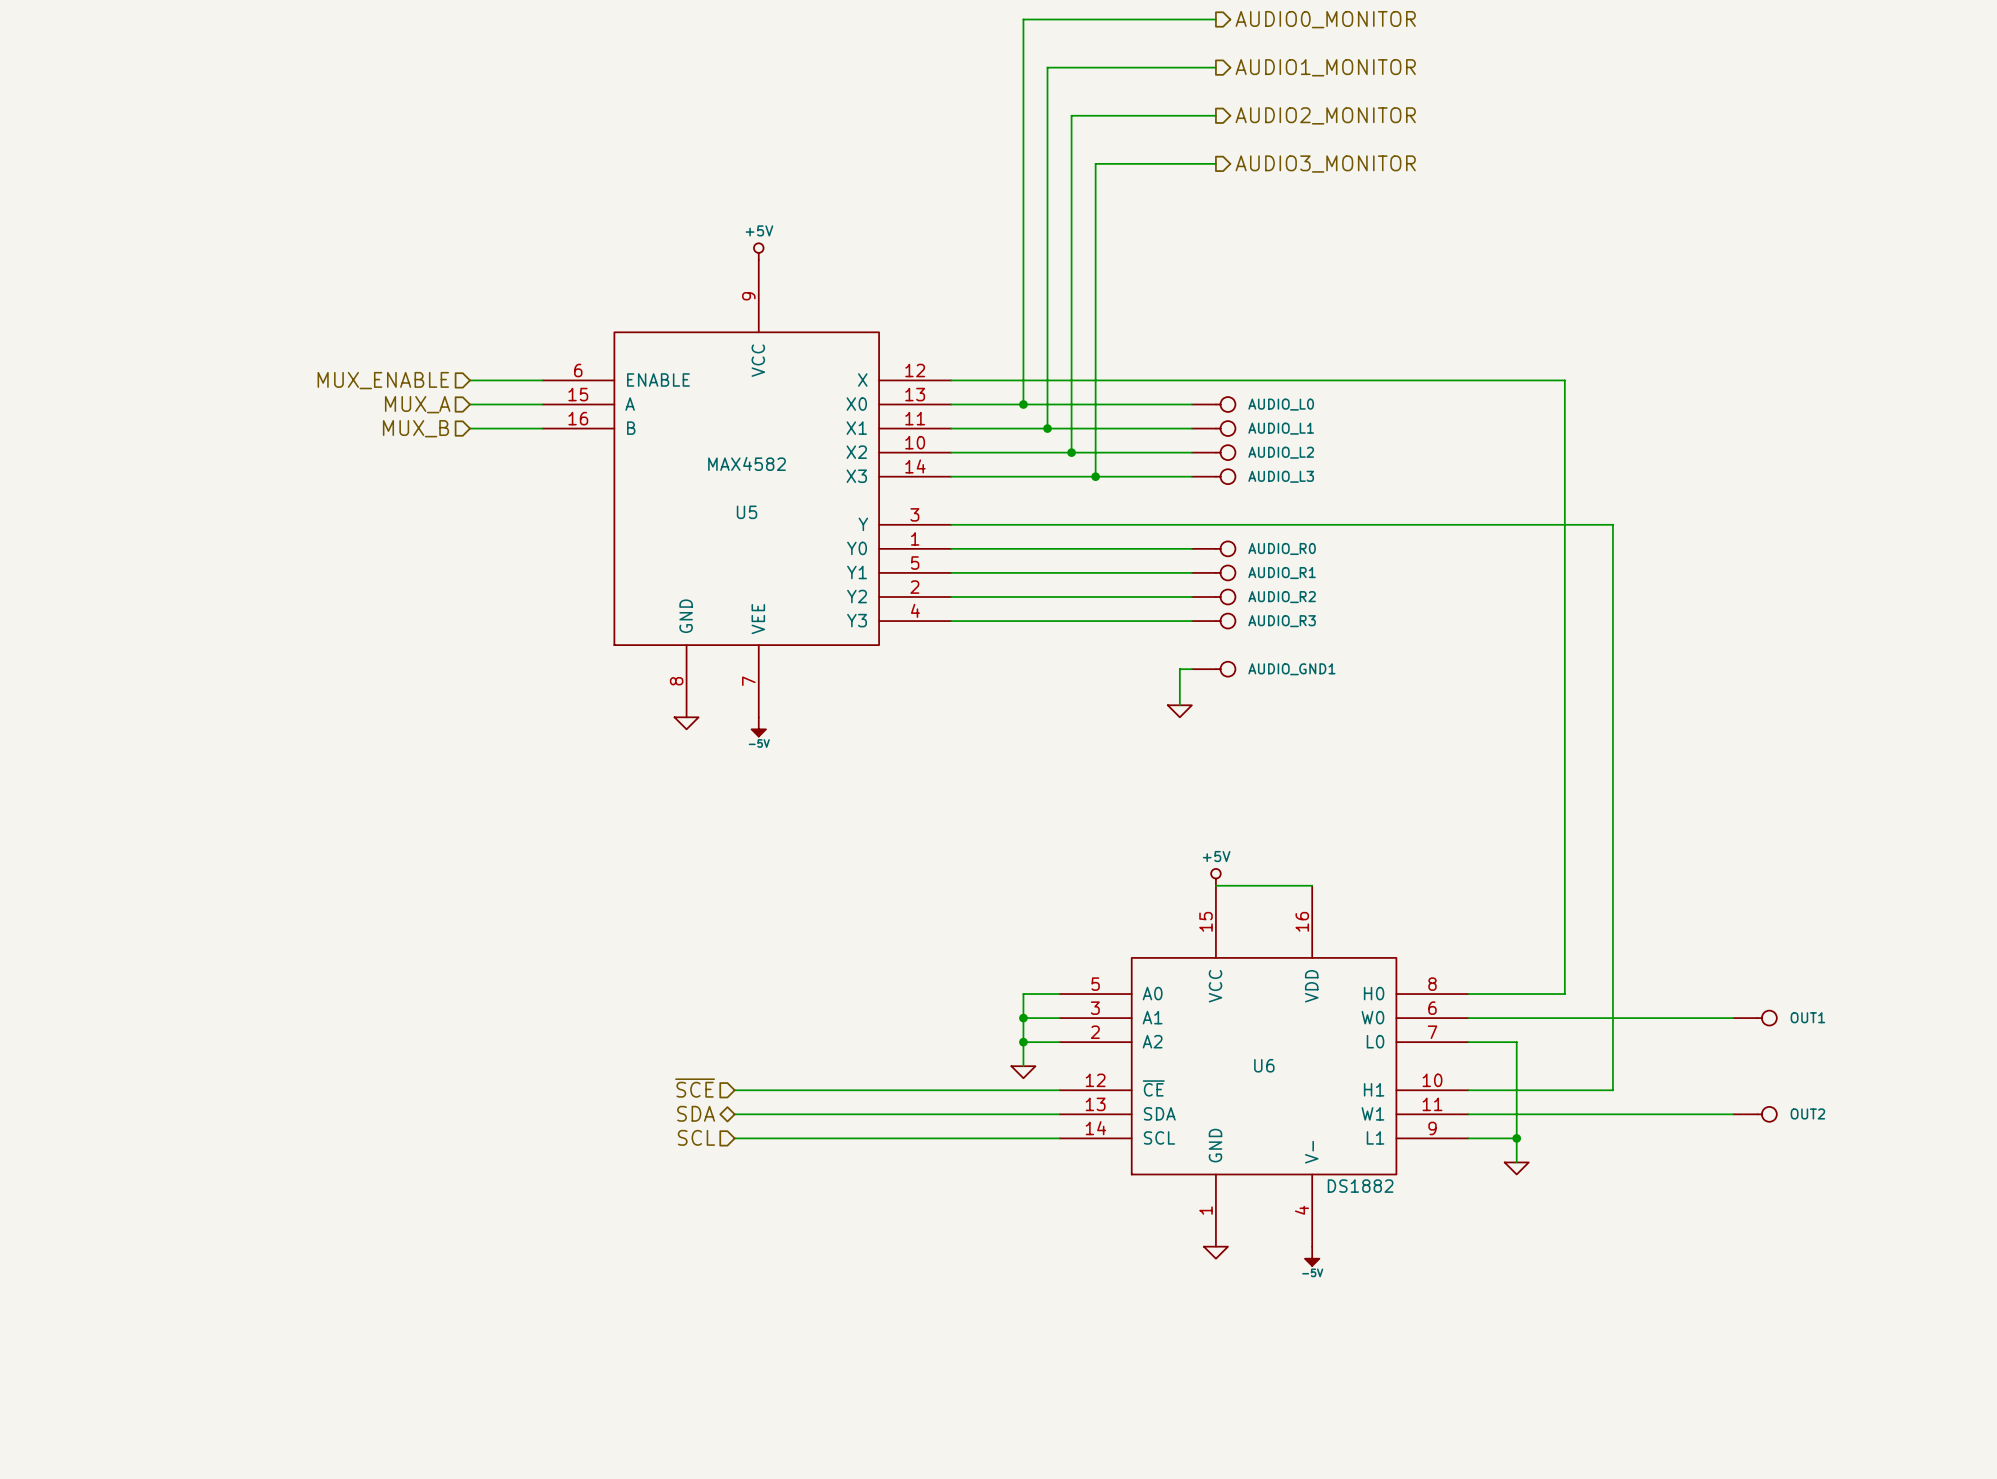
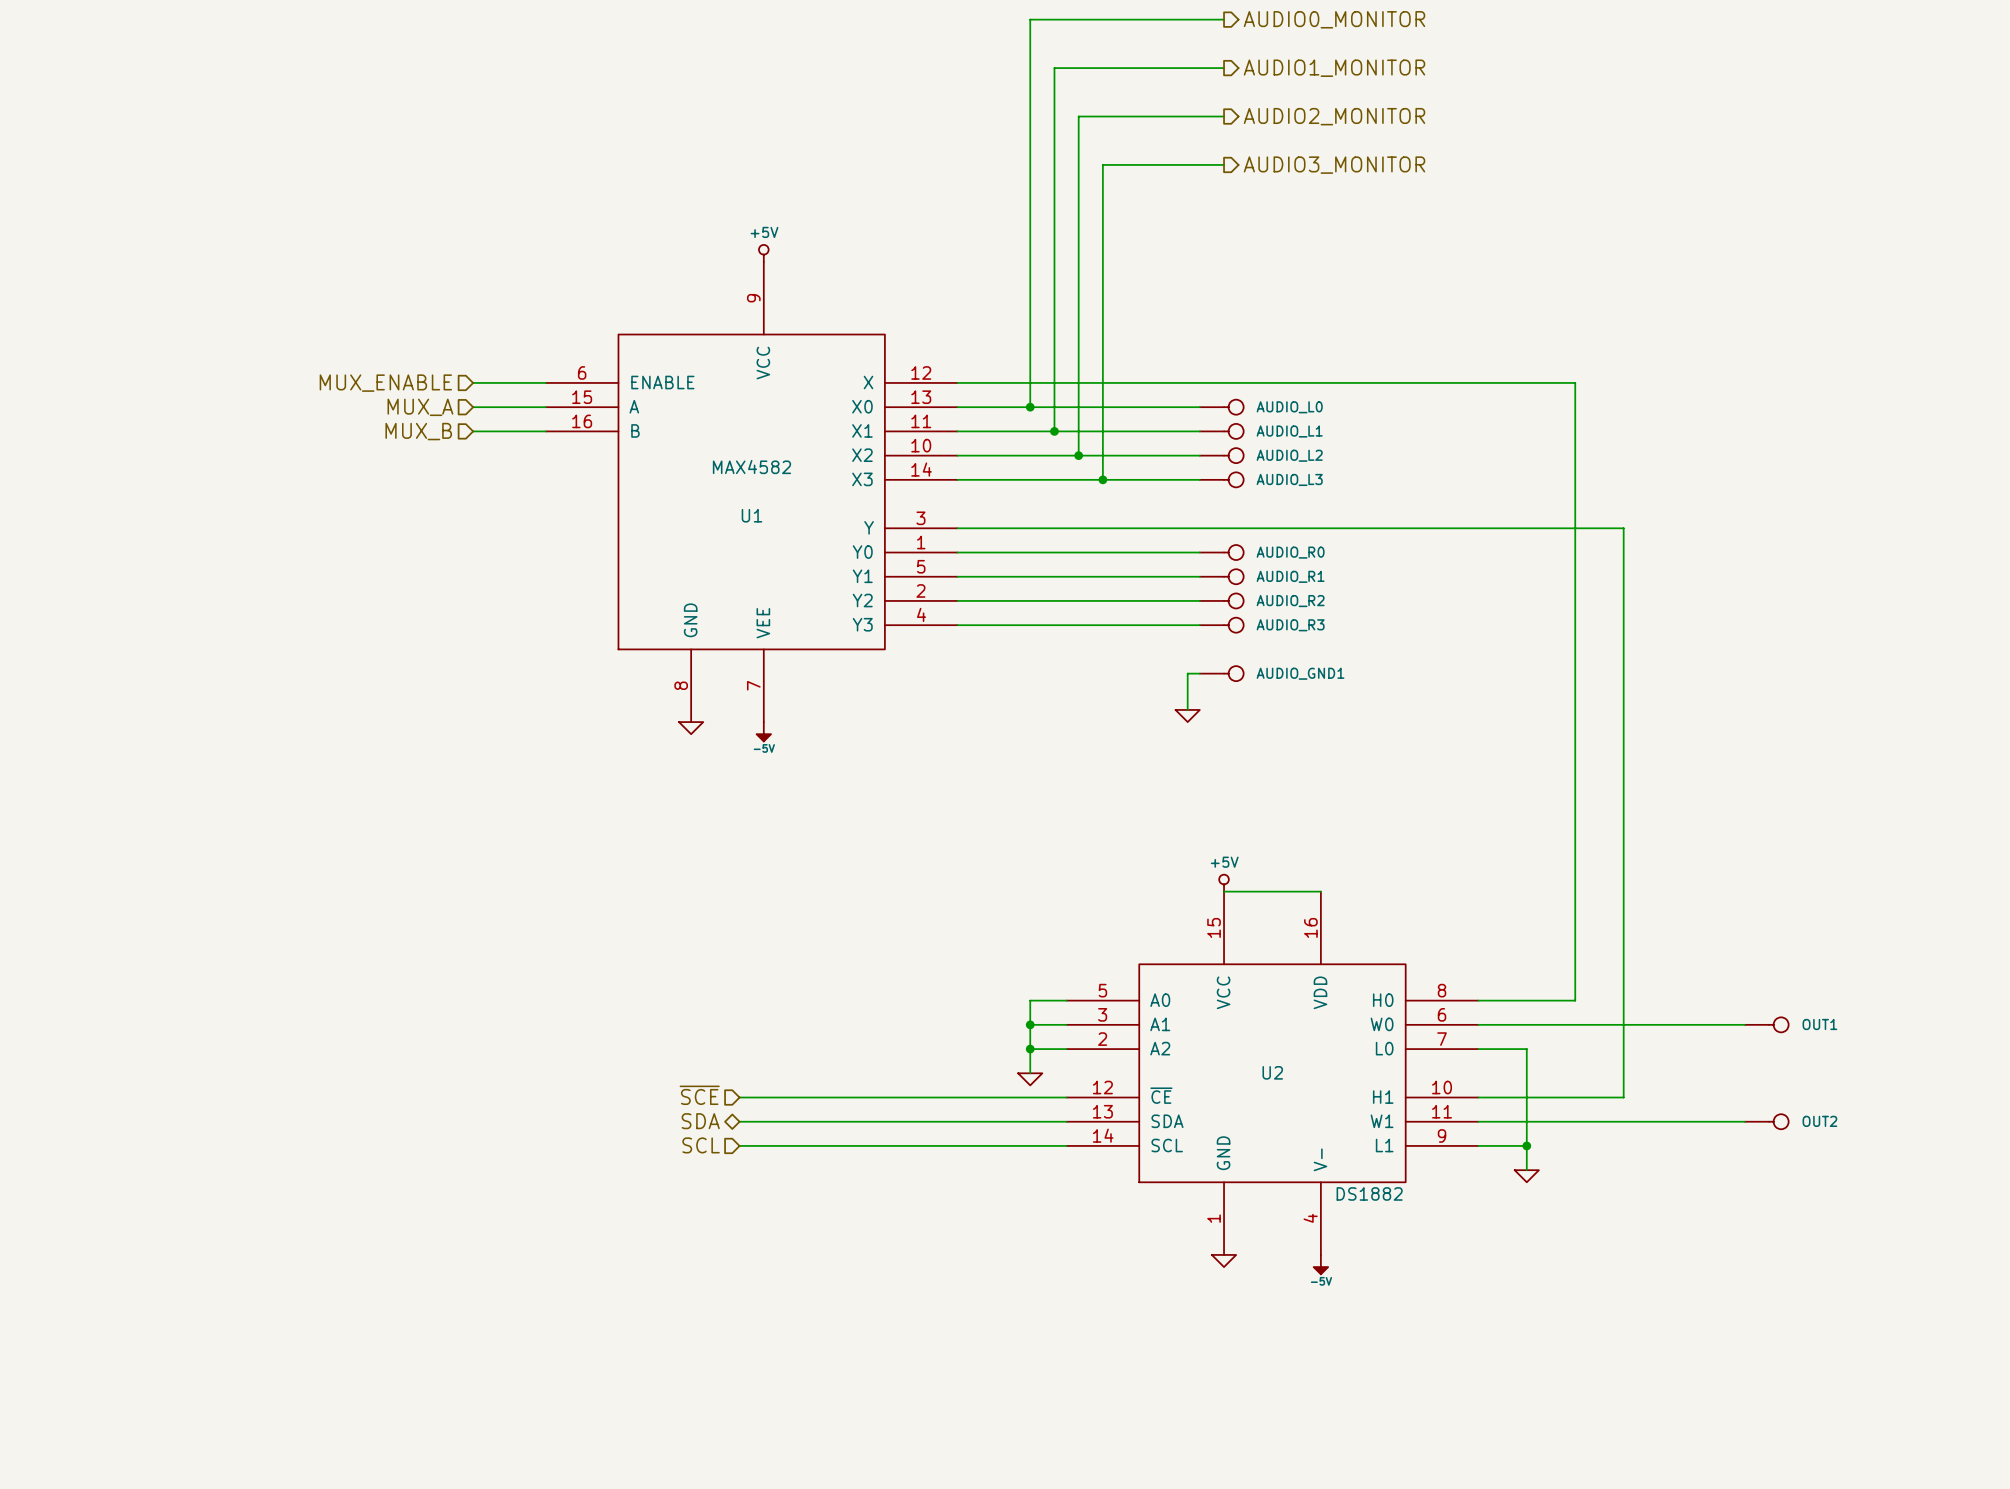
U5 name: U5 (747, 512) -> U1 (751, 515)
U6 name: U6 (1264, 1065) -> U2 (1272, 1072)

